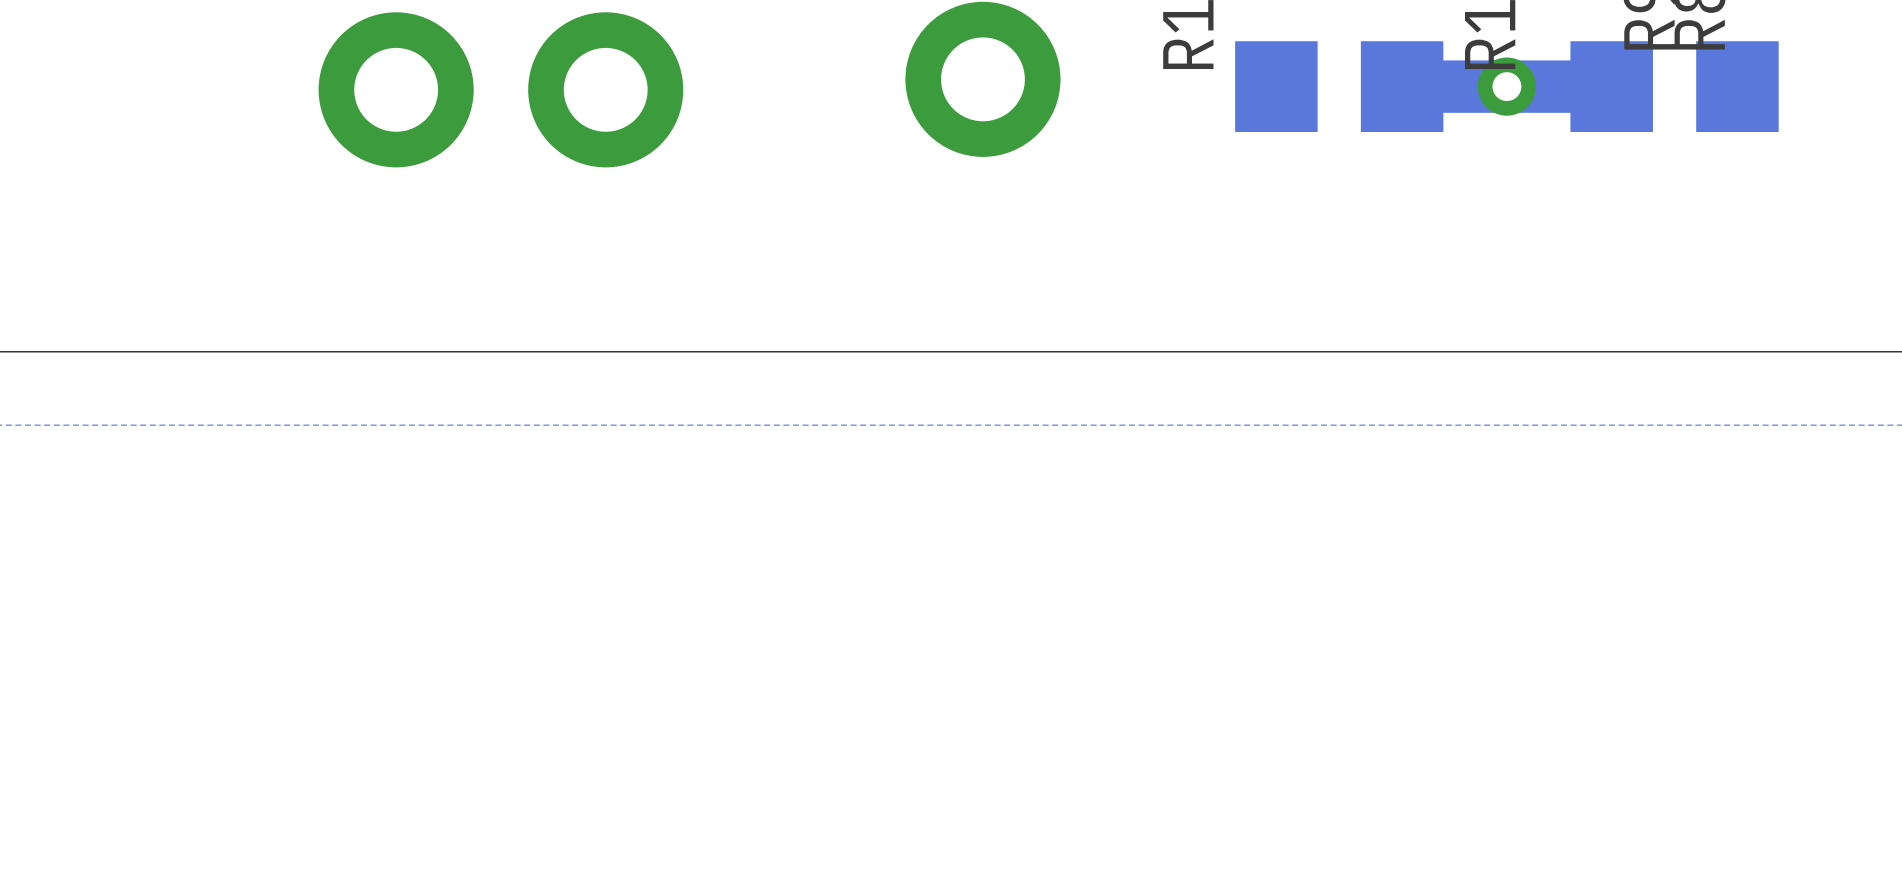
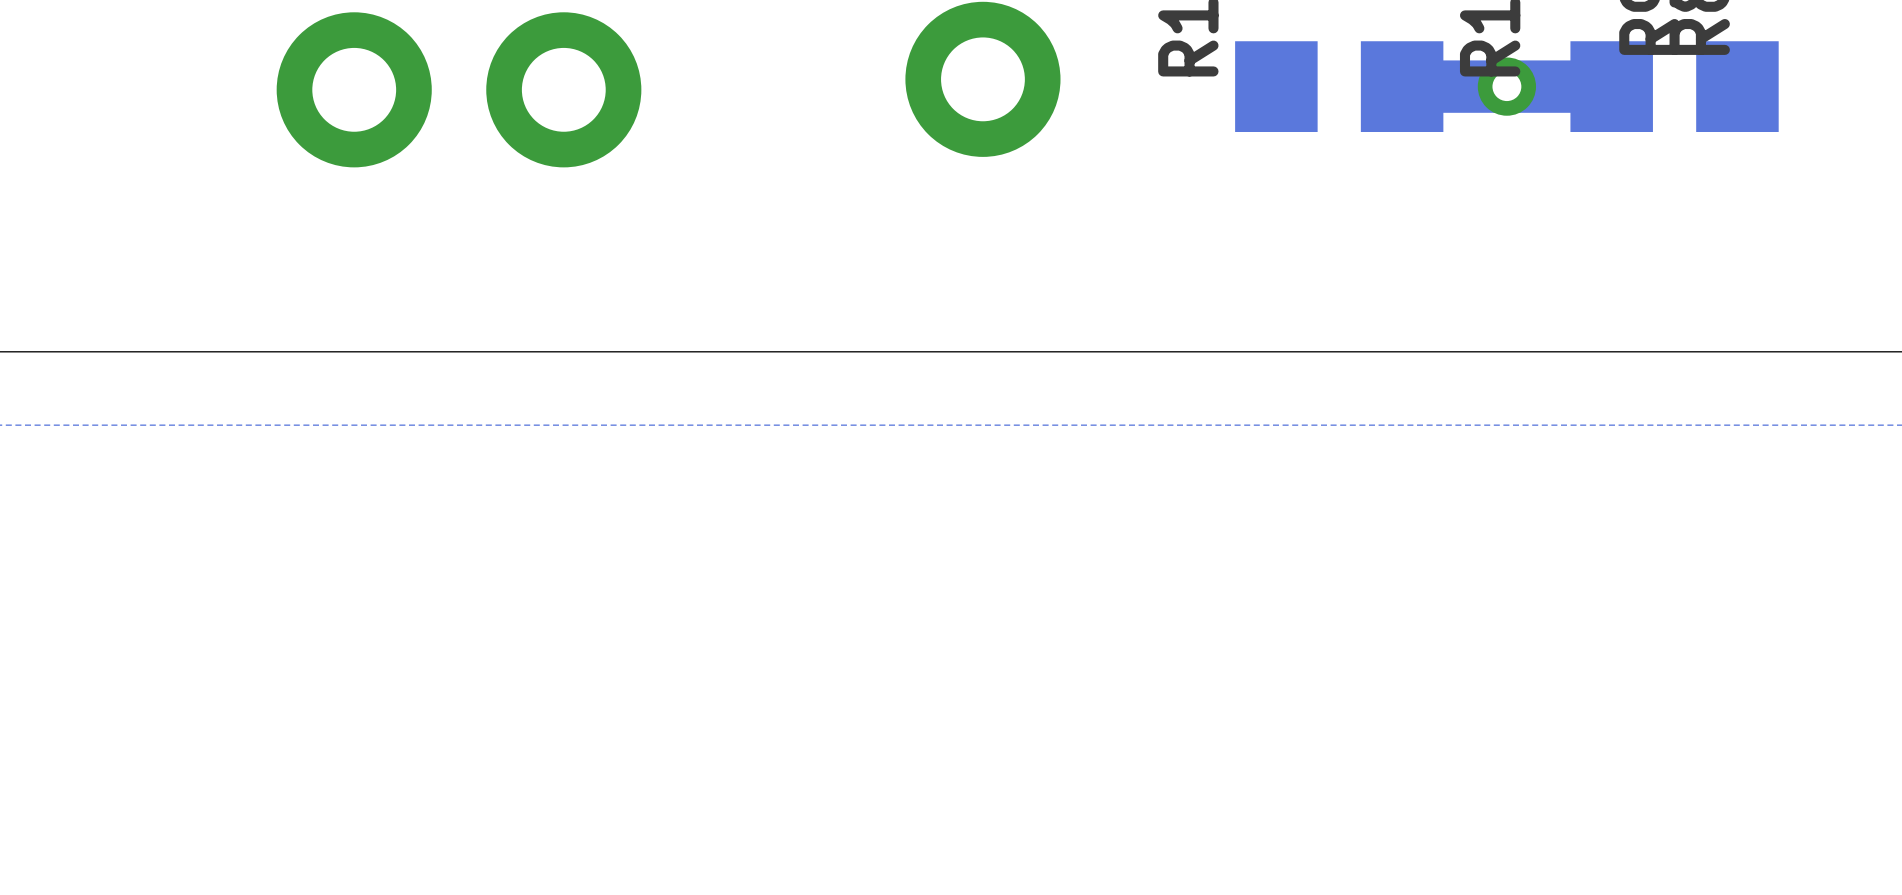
part position: (500, 89) -> (459, 89)

